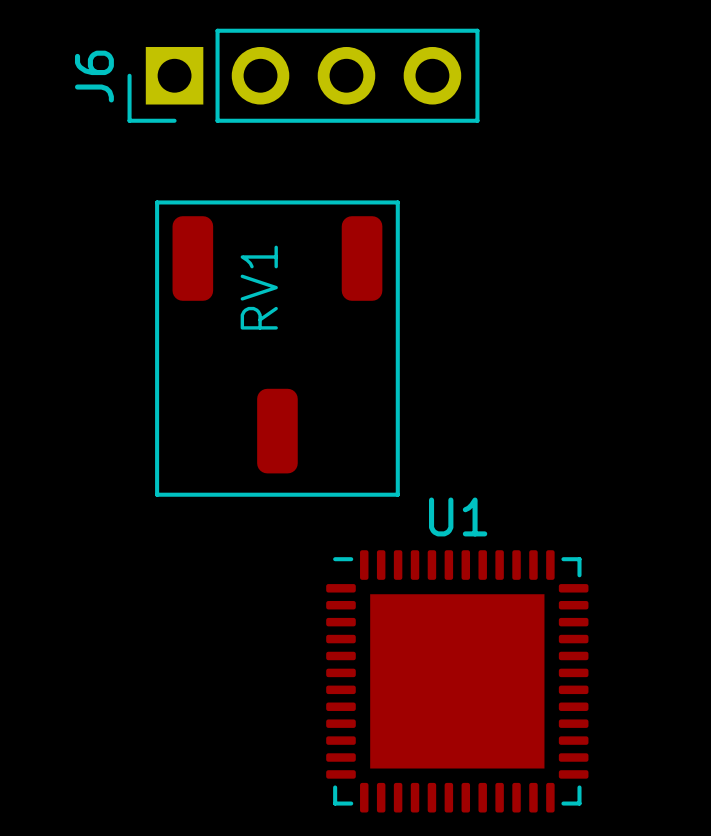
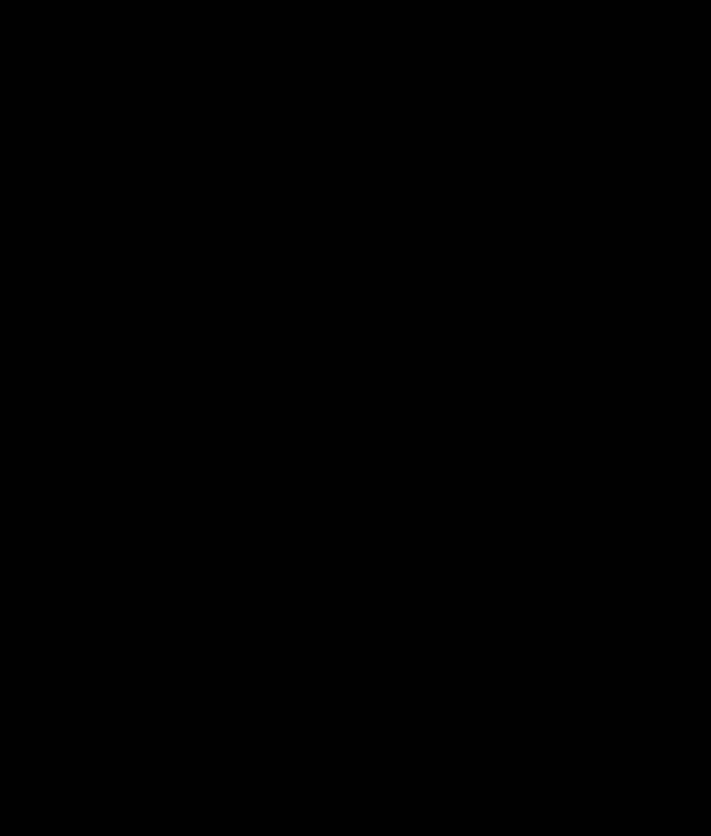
J6: (303, 75) -> none
RV1: (277, 348) -> none
U1: (457, 681) -> none

